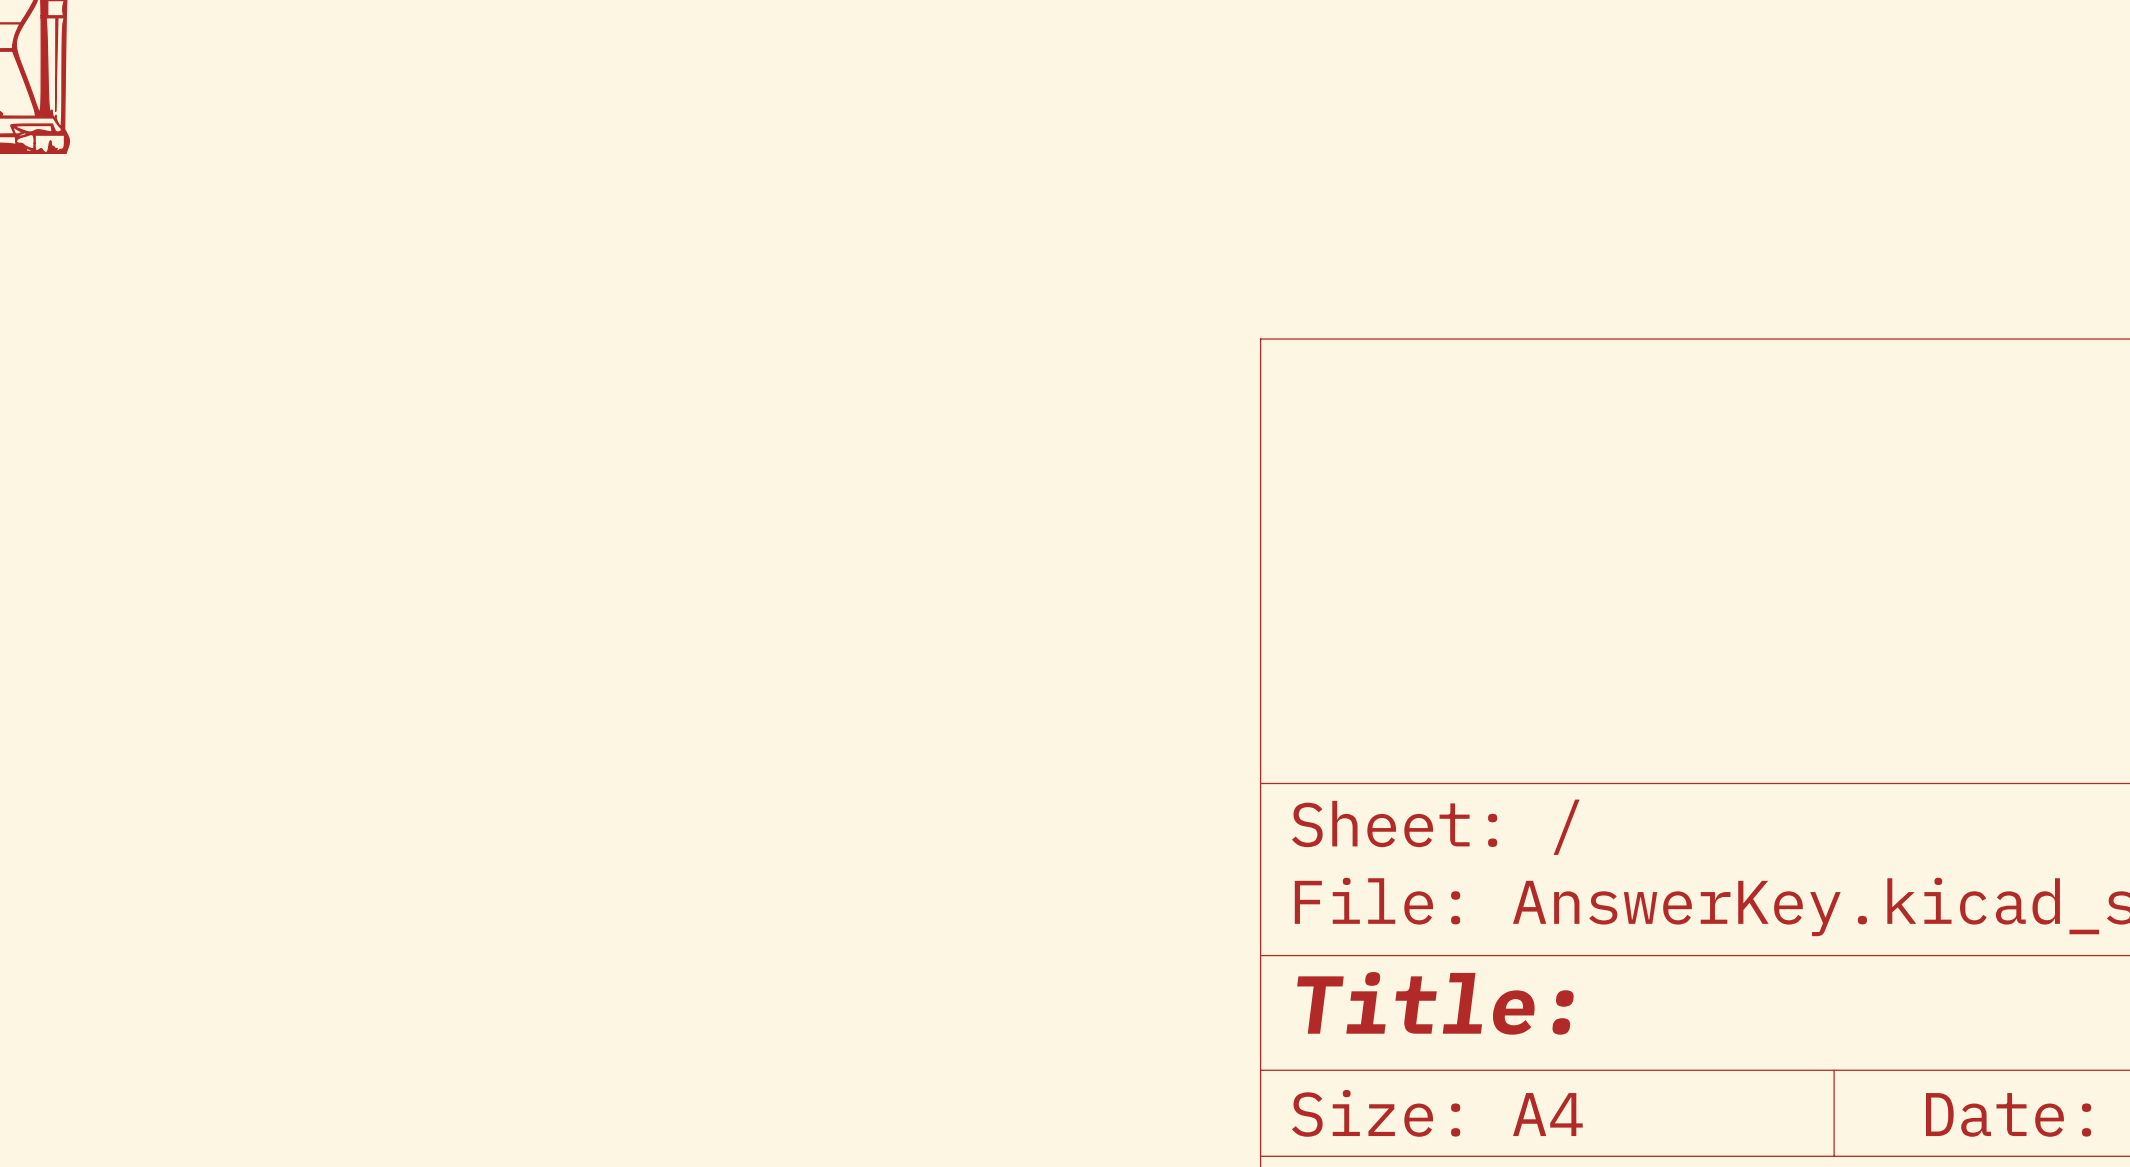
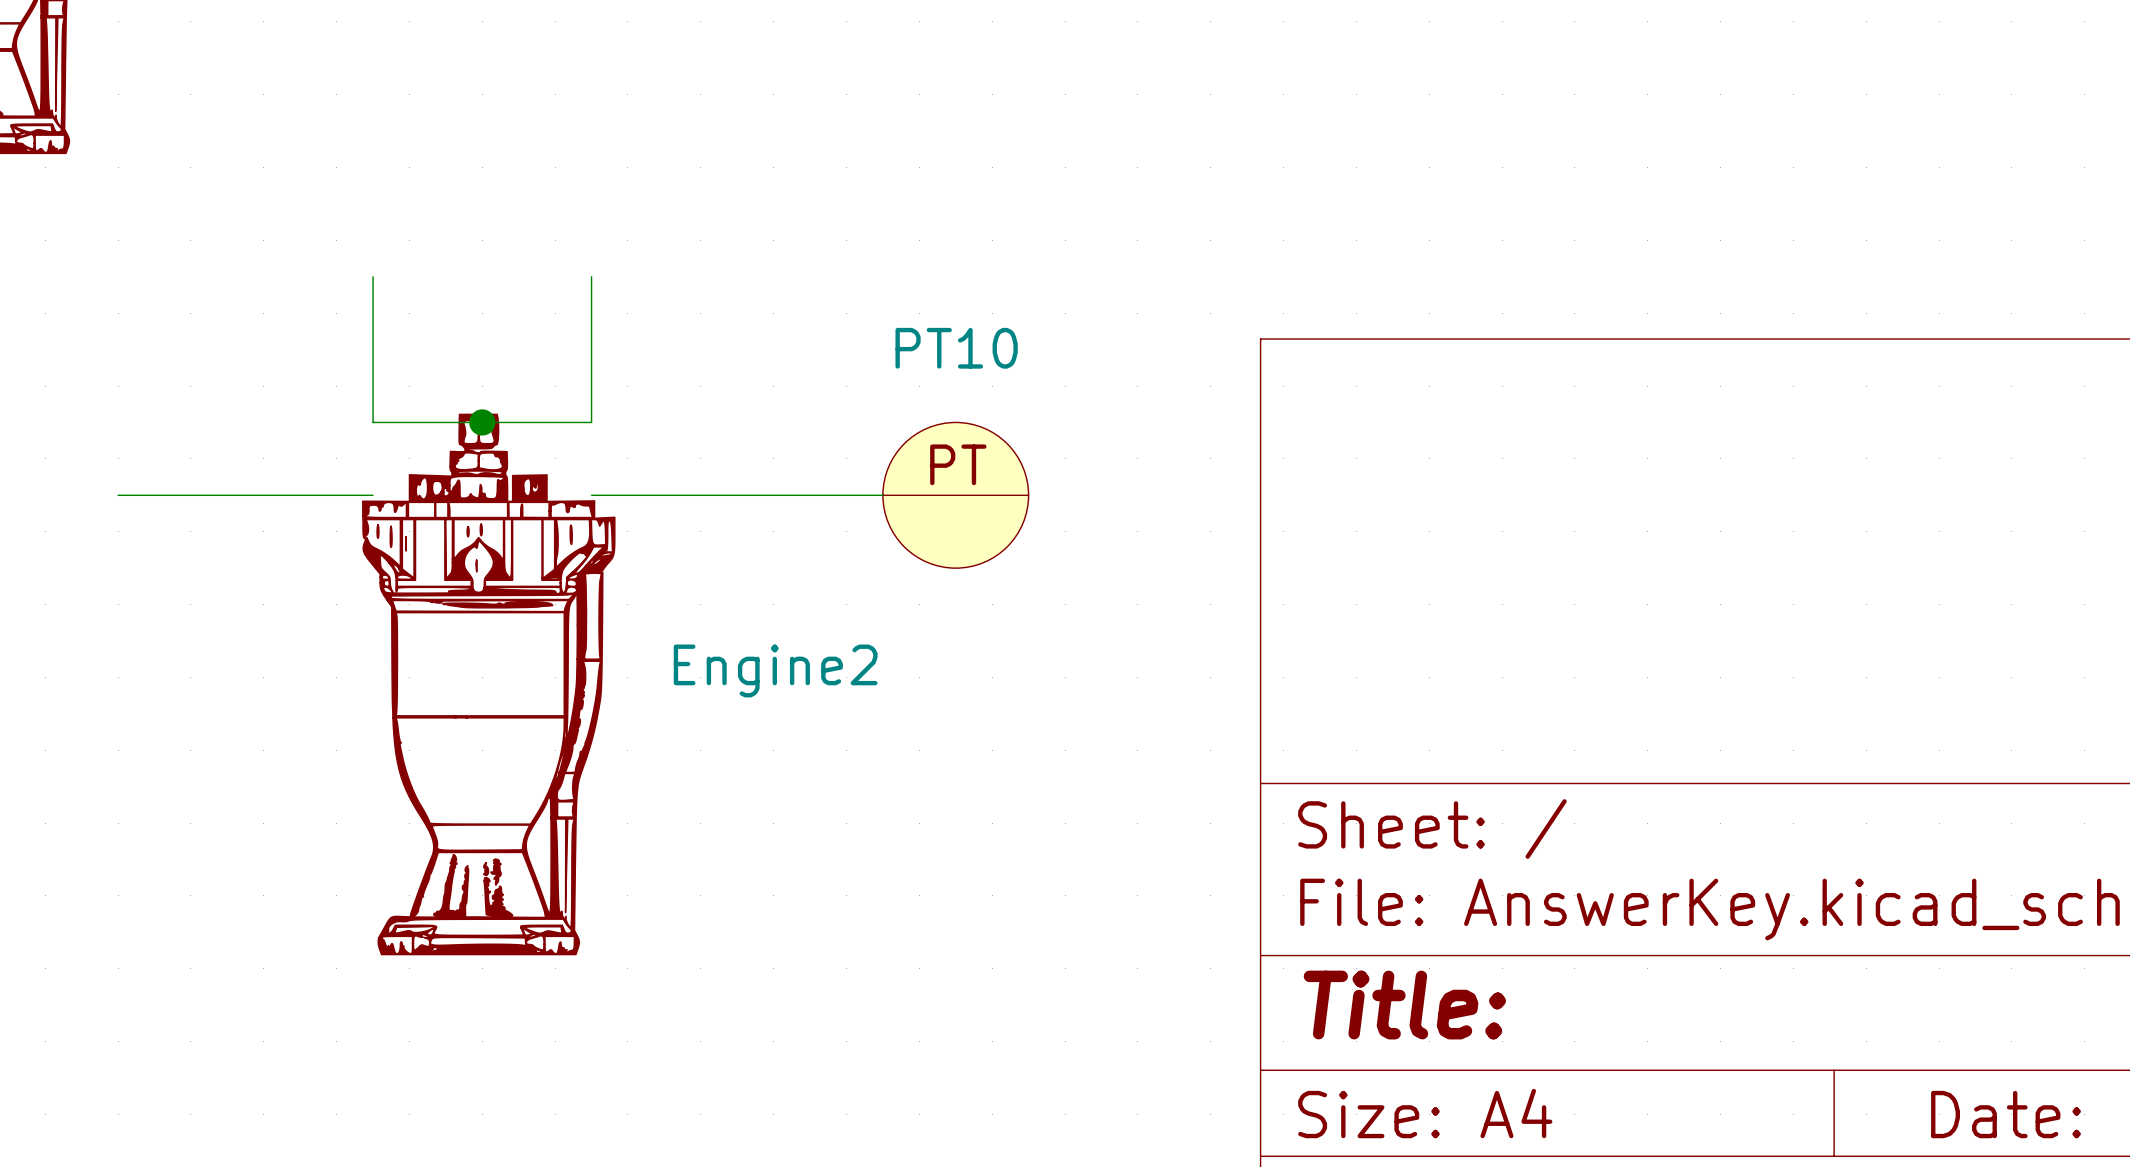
wire: none -> (373, 276) (373, 422) (591, 422) (591, 276)
junction: none -> (482, 422)
wire: none -> (118, 495) (373, 495)
wire: none -> (591, 495) (882, 495)
PT10: none -> (955, 495)
Engine2: none -> (488, 684)

